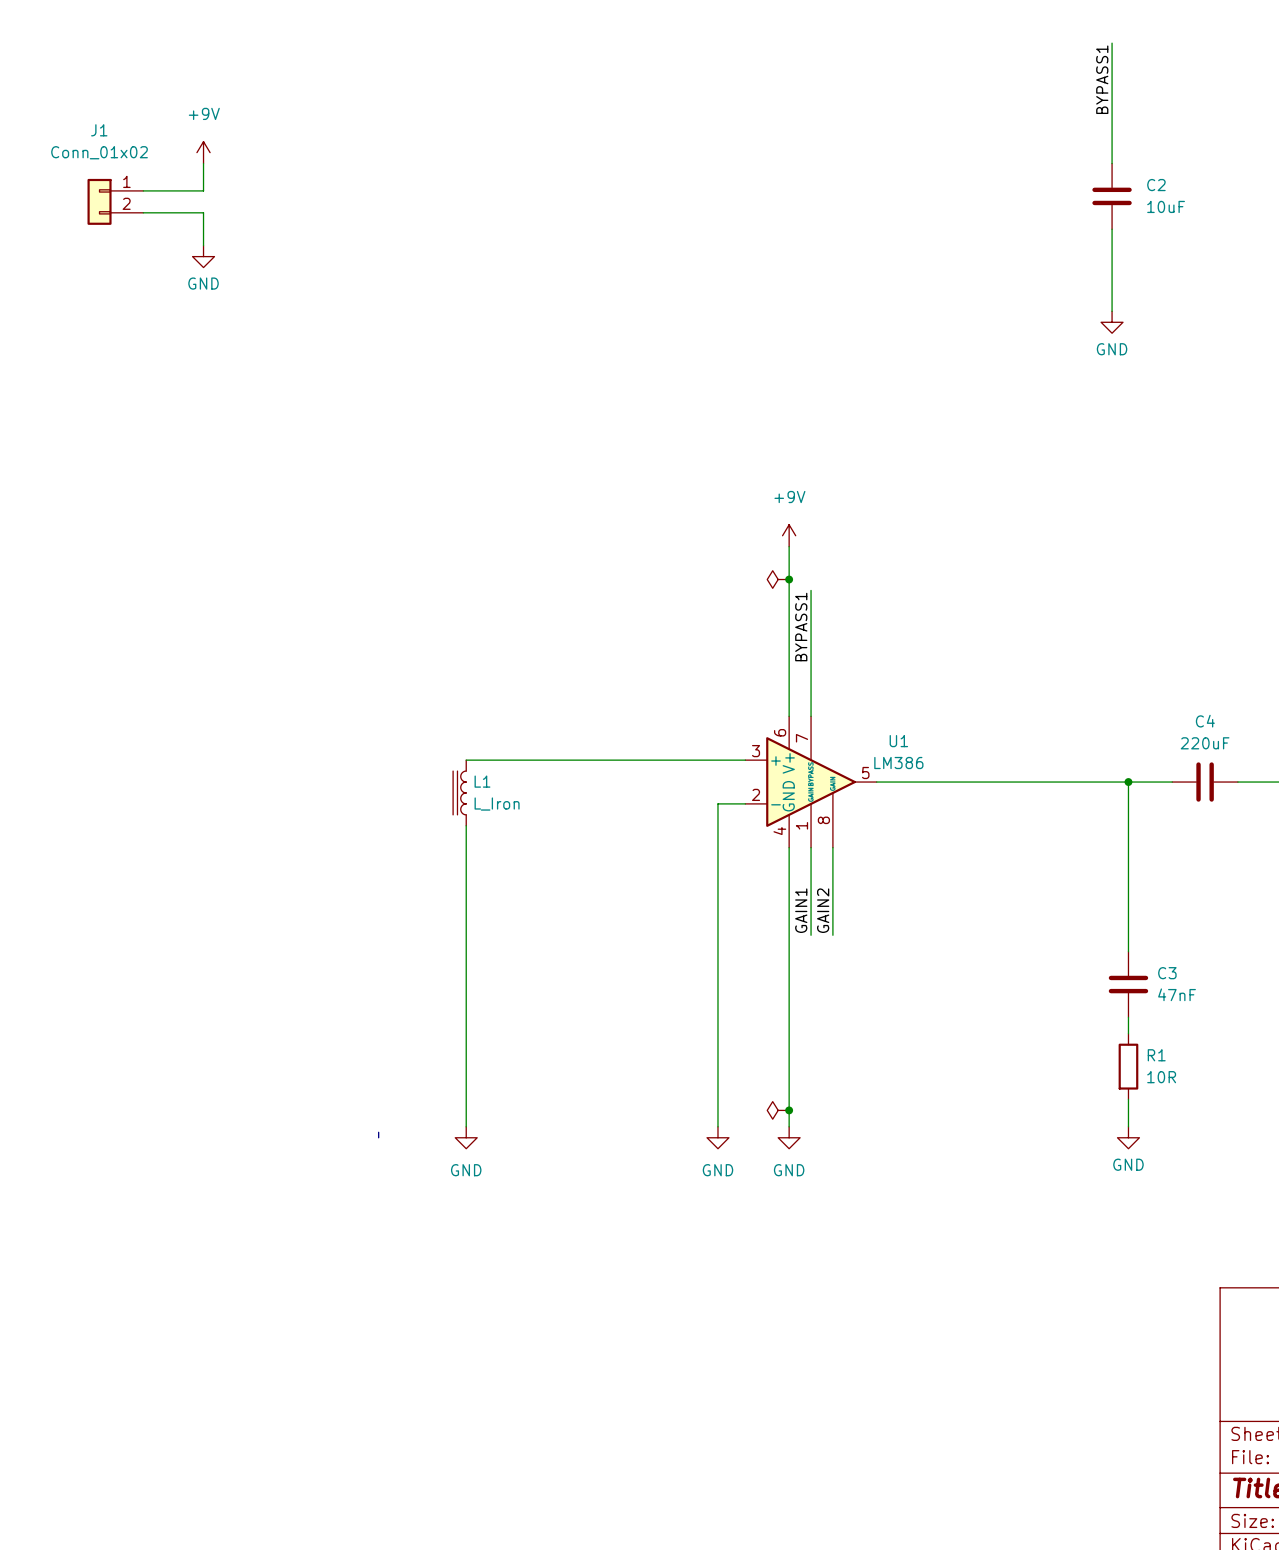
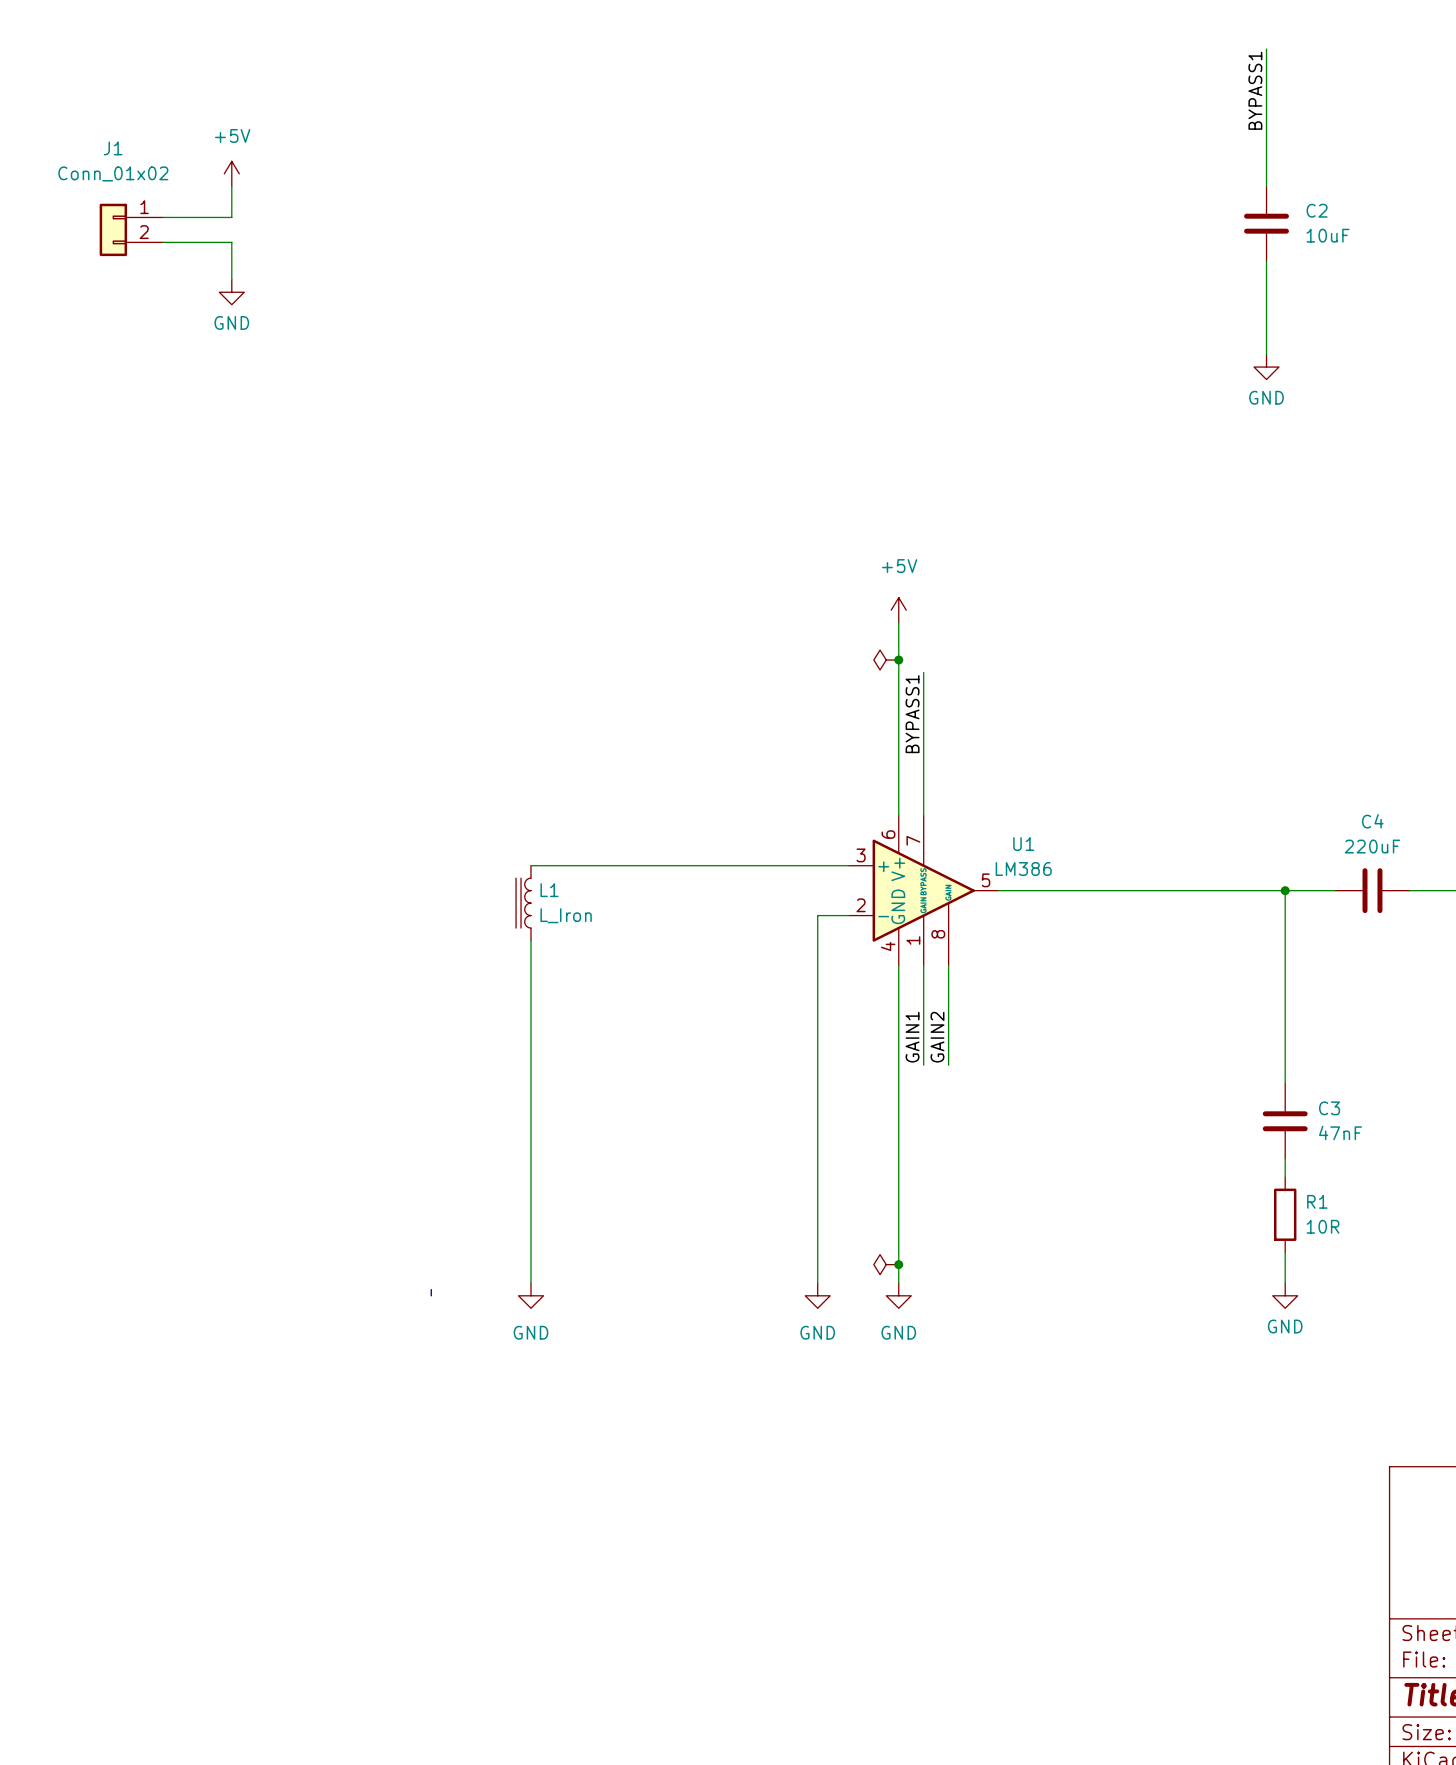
power symbol: +9V (203, 152) -> +5V (231, 173)
power symbol: +9V (789, 535) -> +5V (898, 610)

